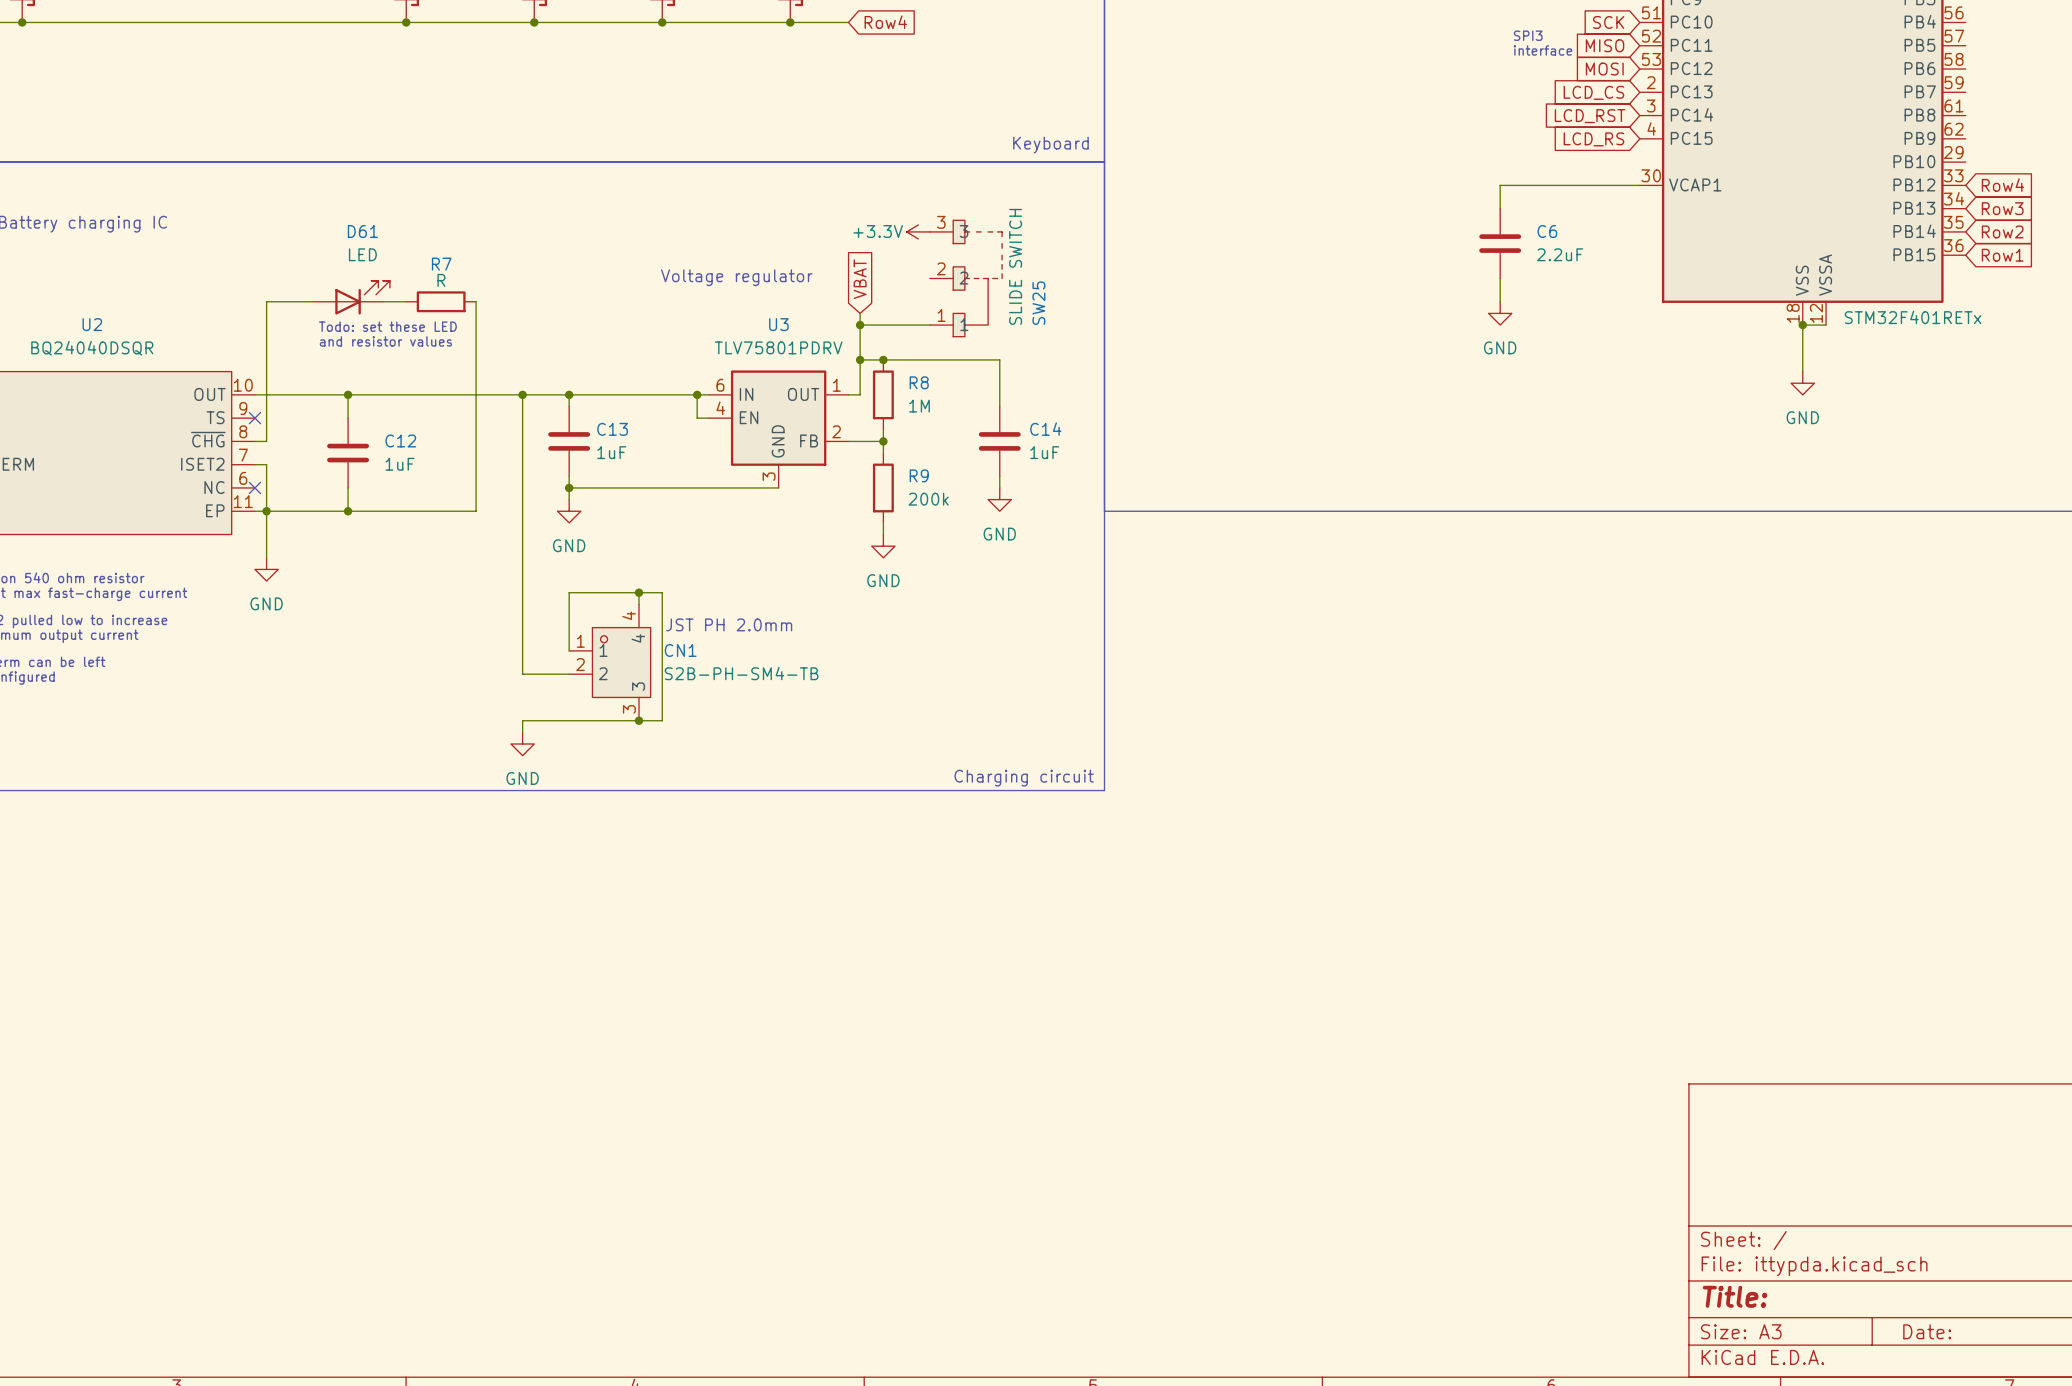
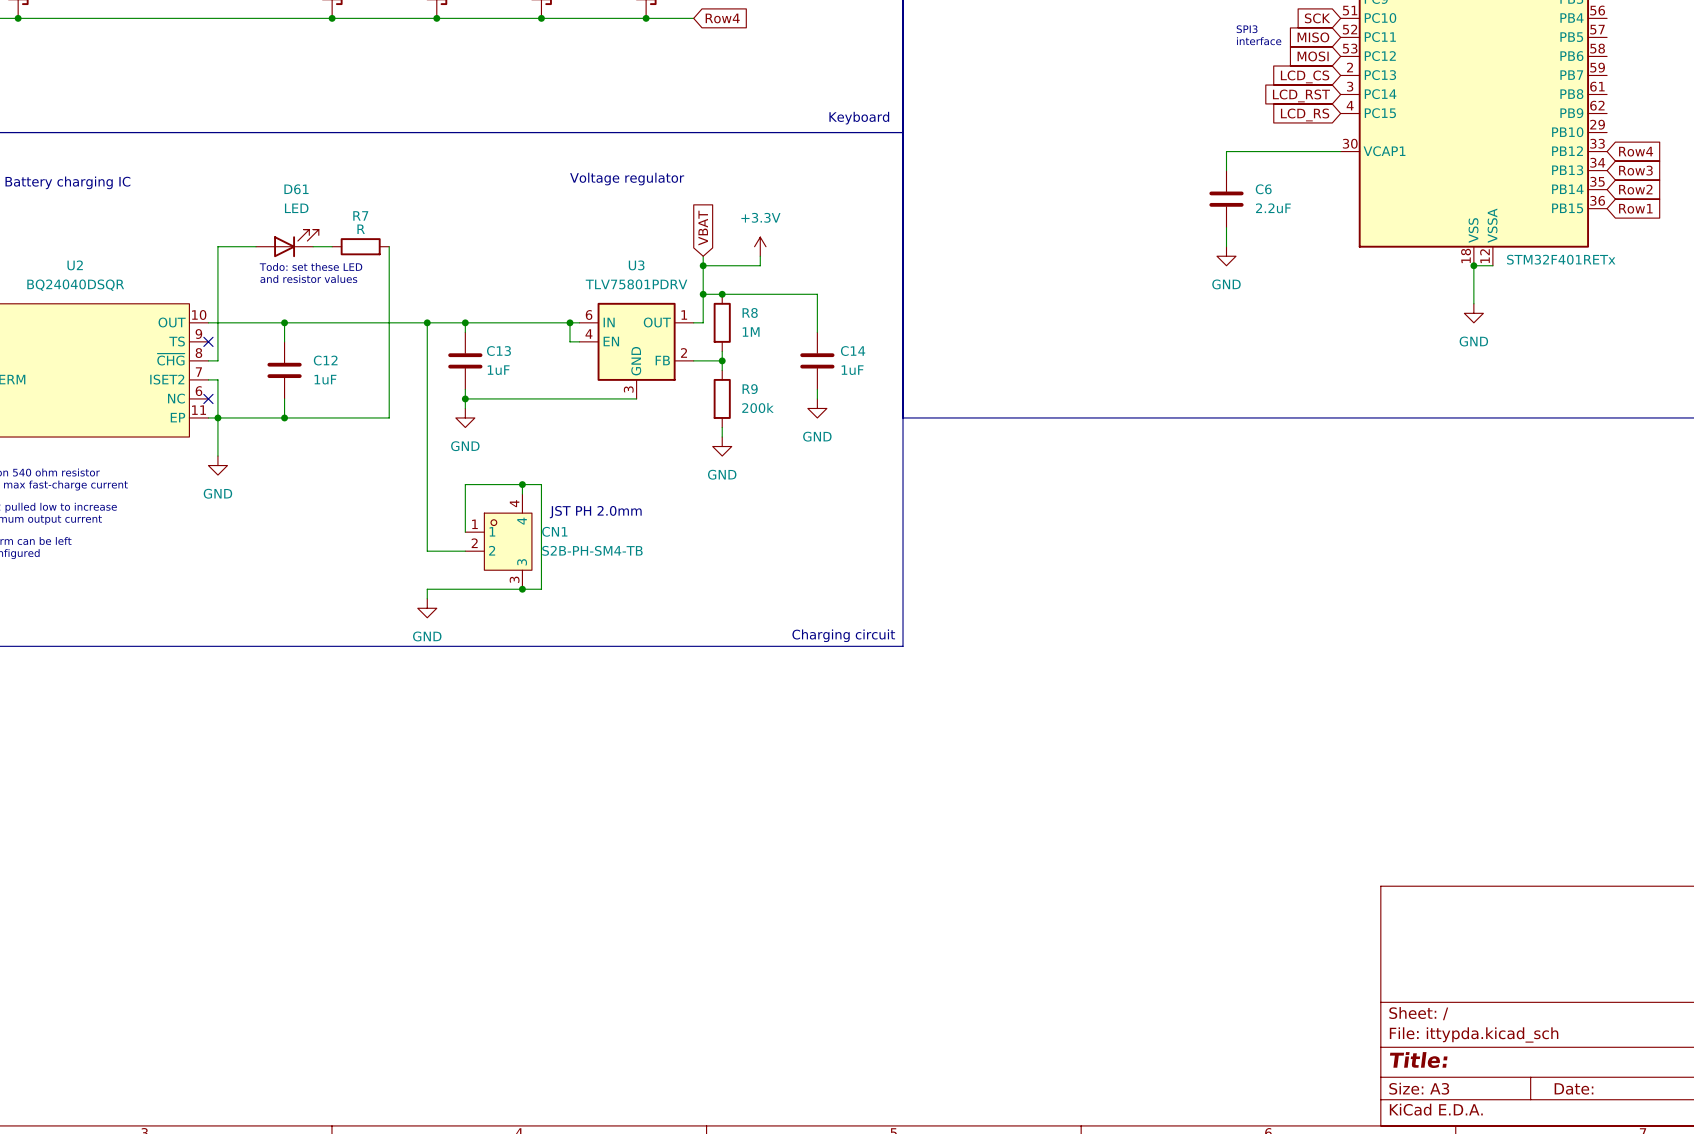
power symbol rotation: 0° (918, 231) -> 90° clockwise (760, 246)
power symbol position: +3.3V (918, 231) -> +3.3V (760, 246)
text position: Voltage regulator (736, 277) -> Voltage regulator (627, 179)
SW25: SLIDE SWITCH (965, 278) -> none
wire: none -> (760, 256) (760, 265)

